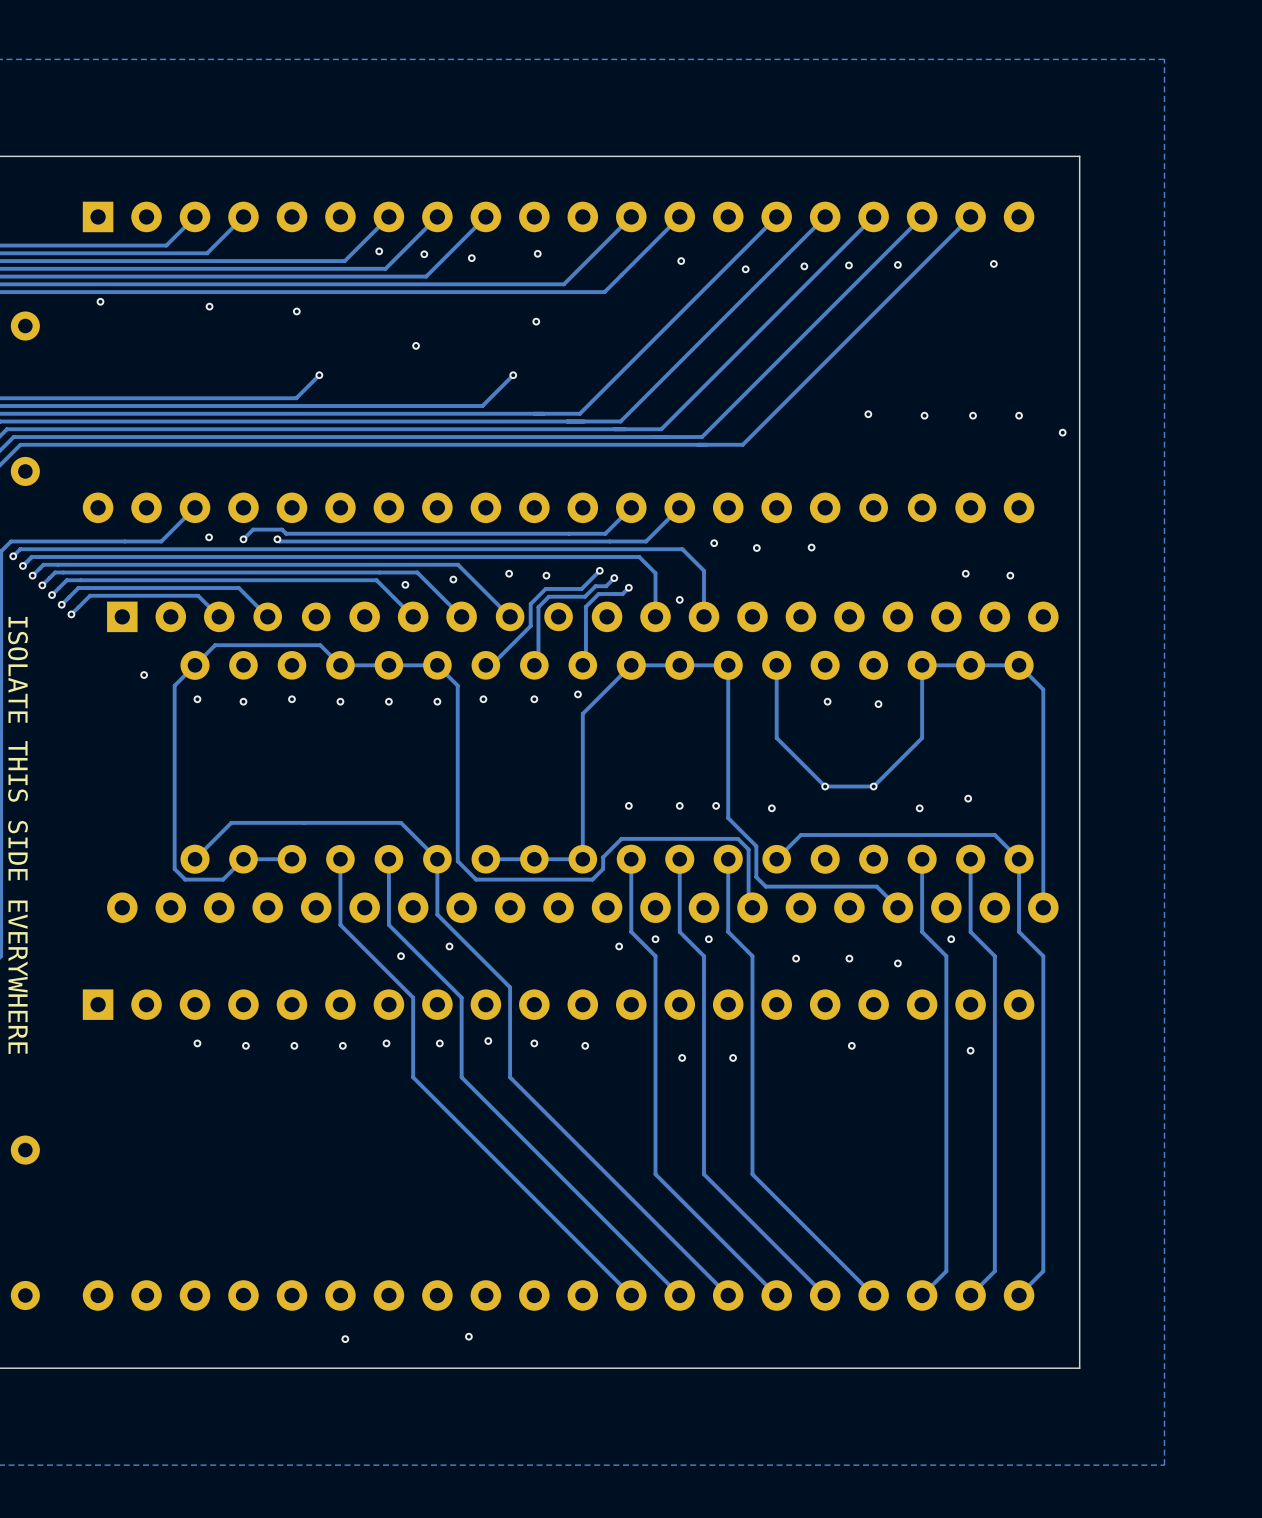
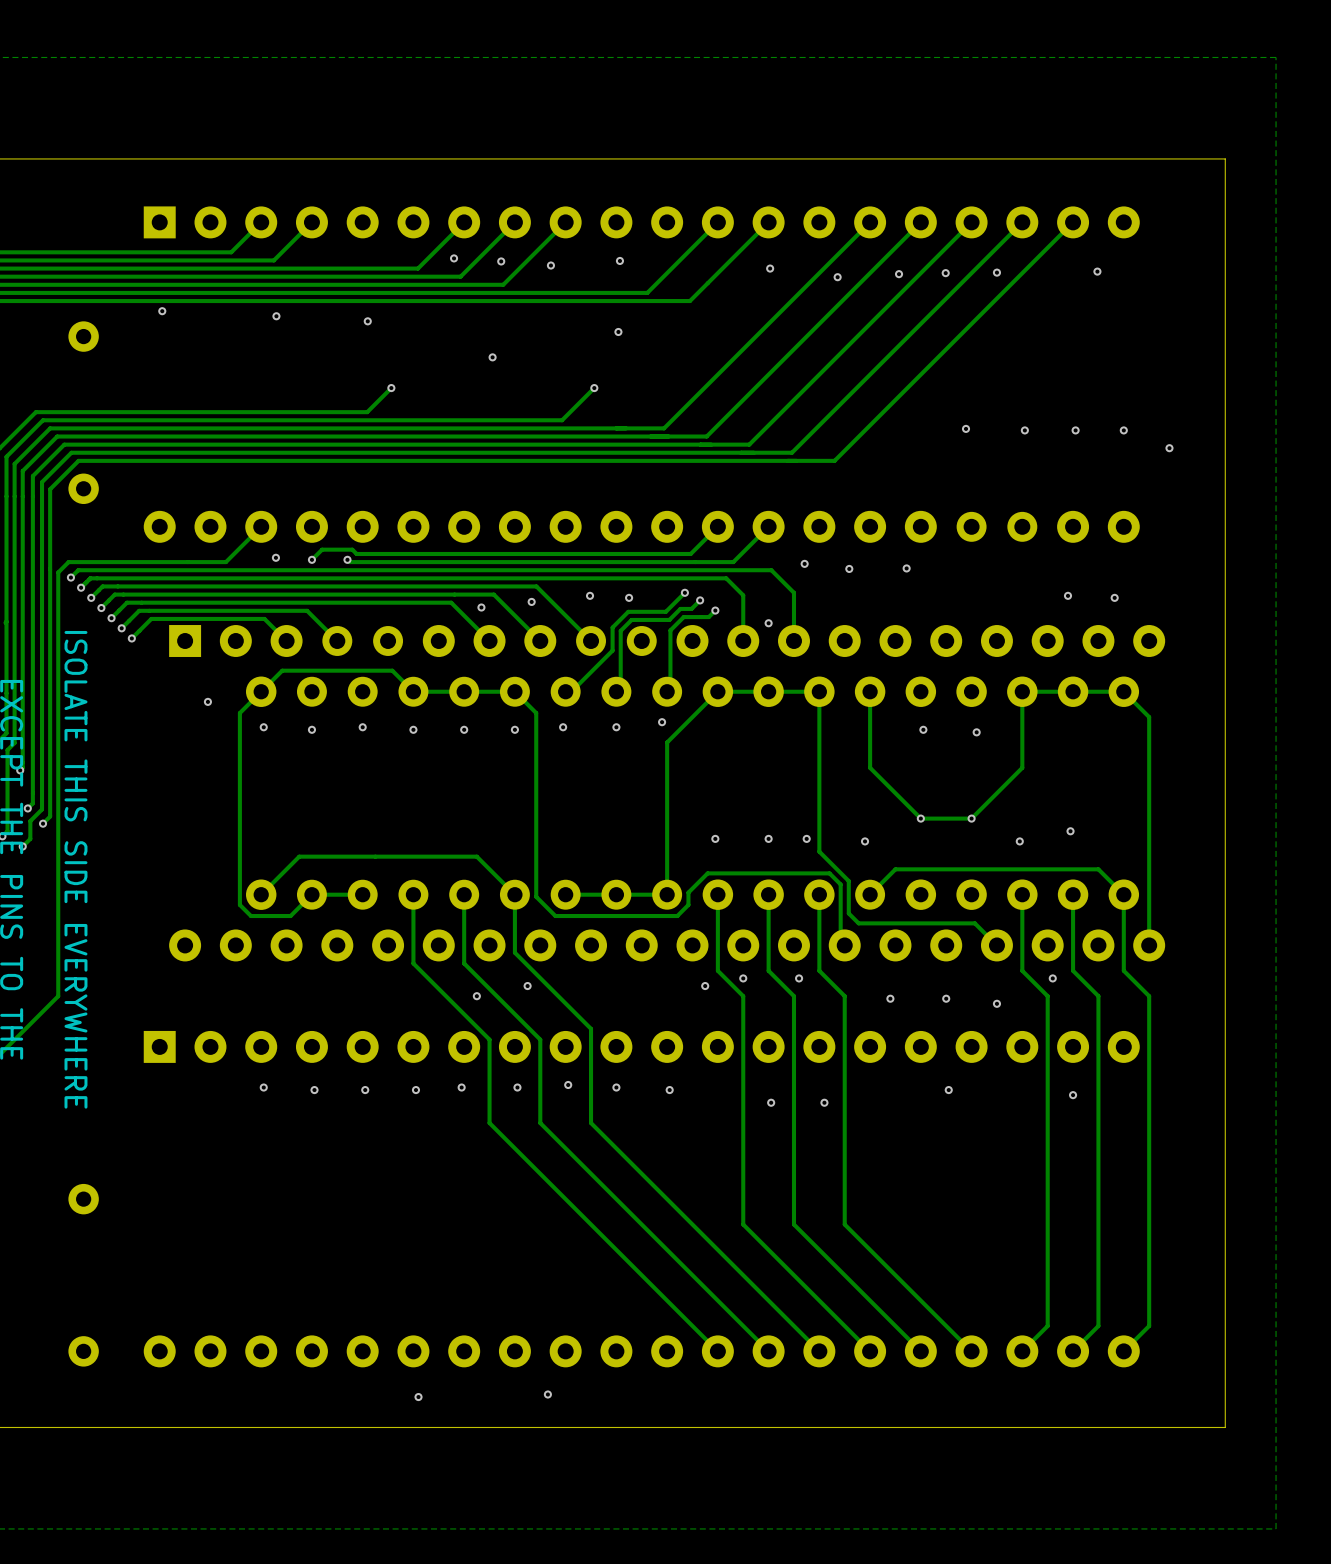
board edge: (1079, 156) (1079, 1368) -> (1187, 158) (1225, 158) (1225, 1427) (1187, 1427)

